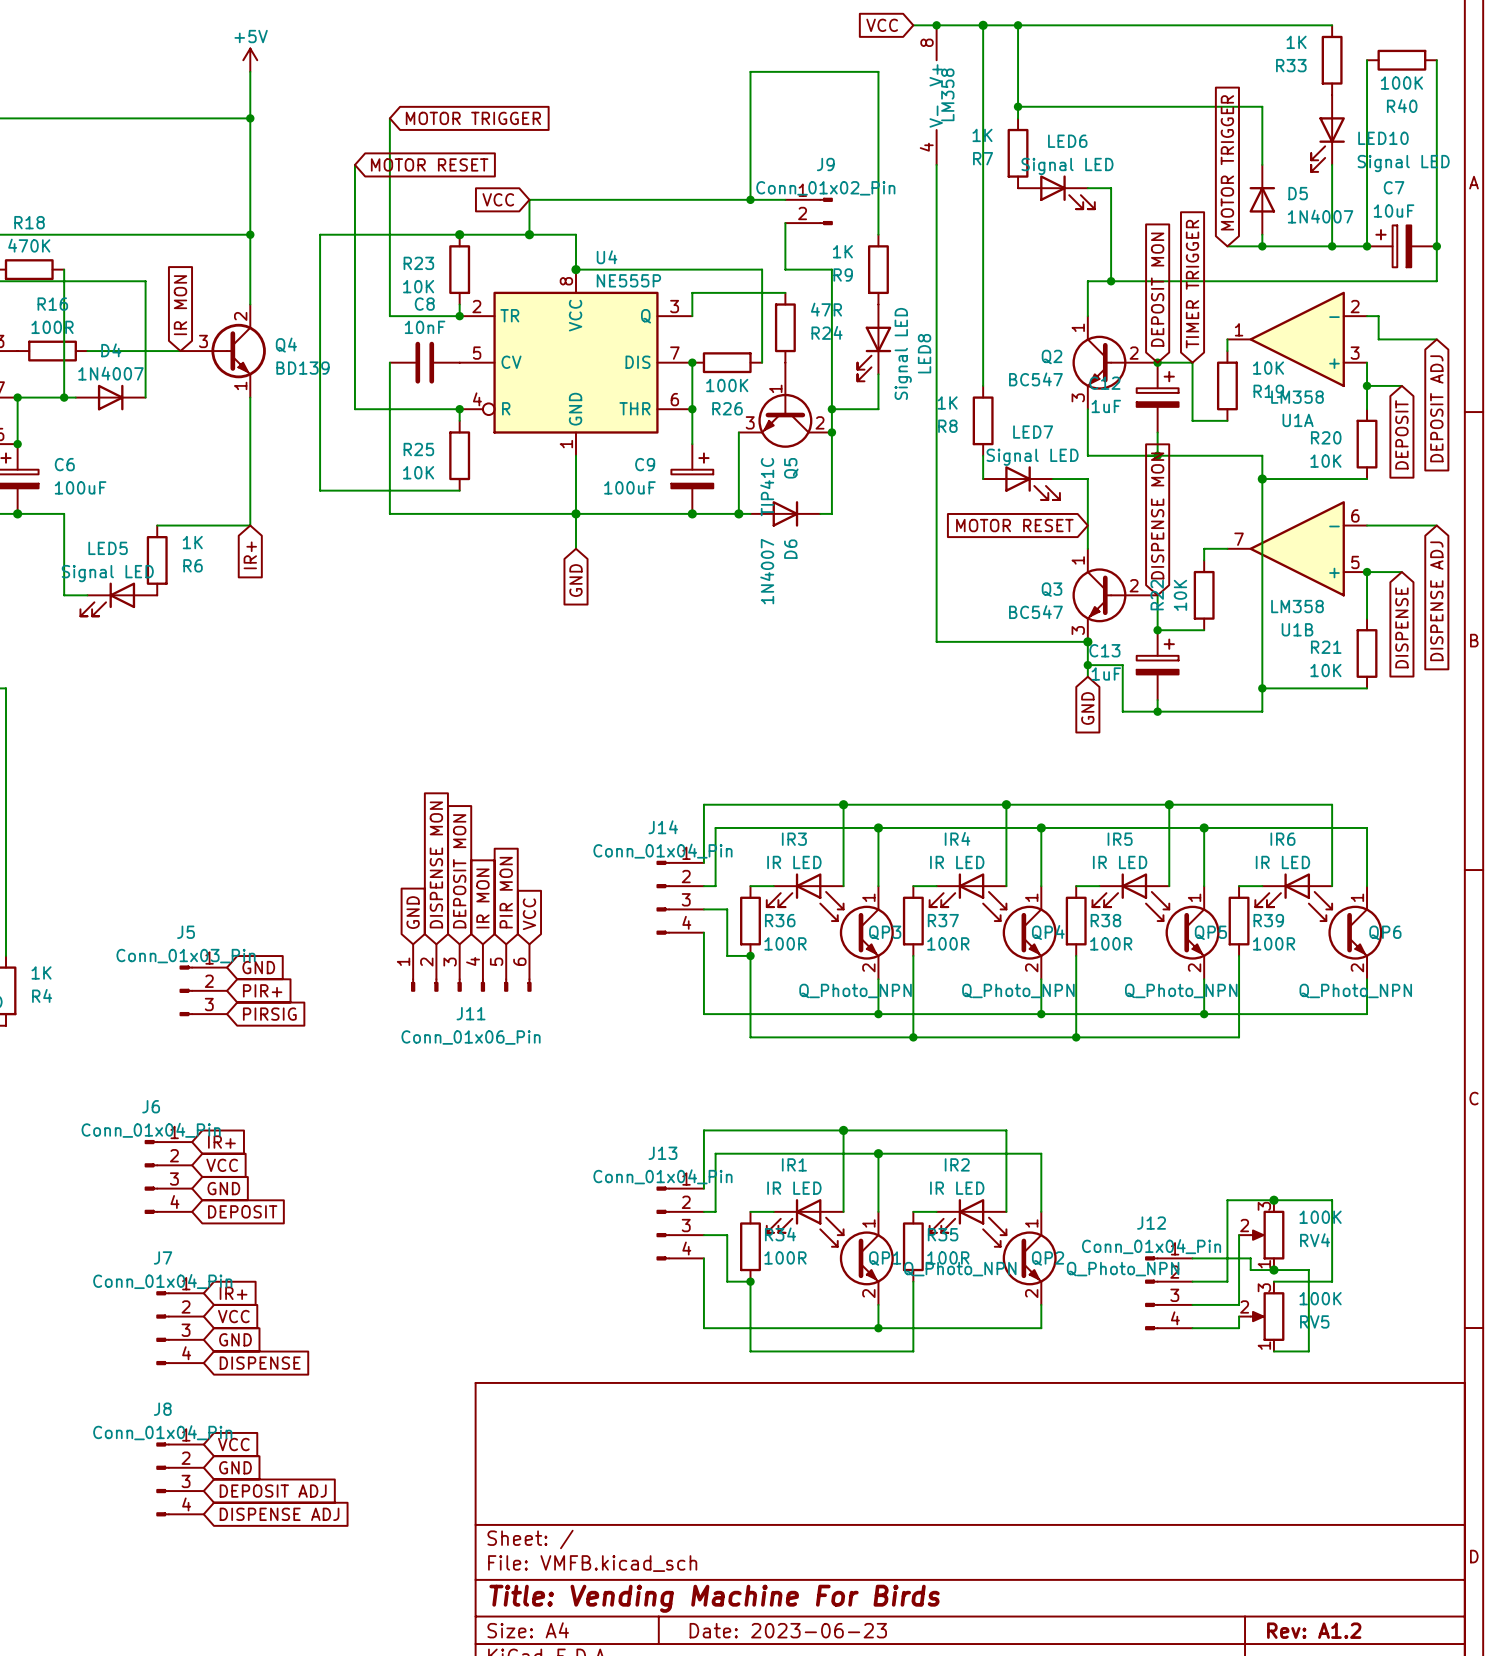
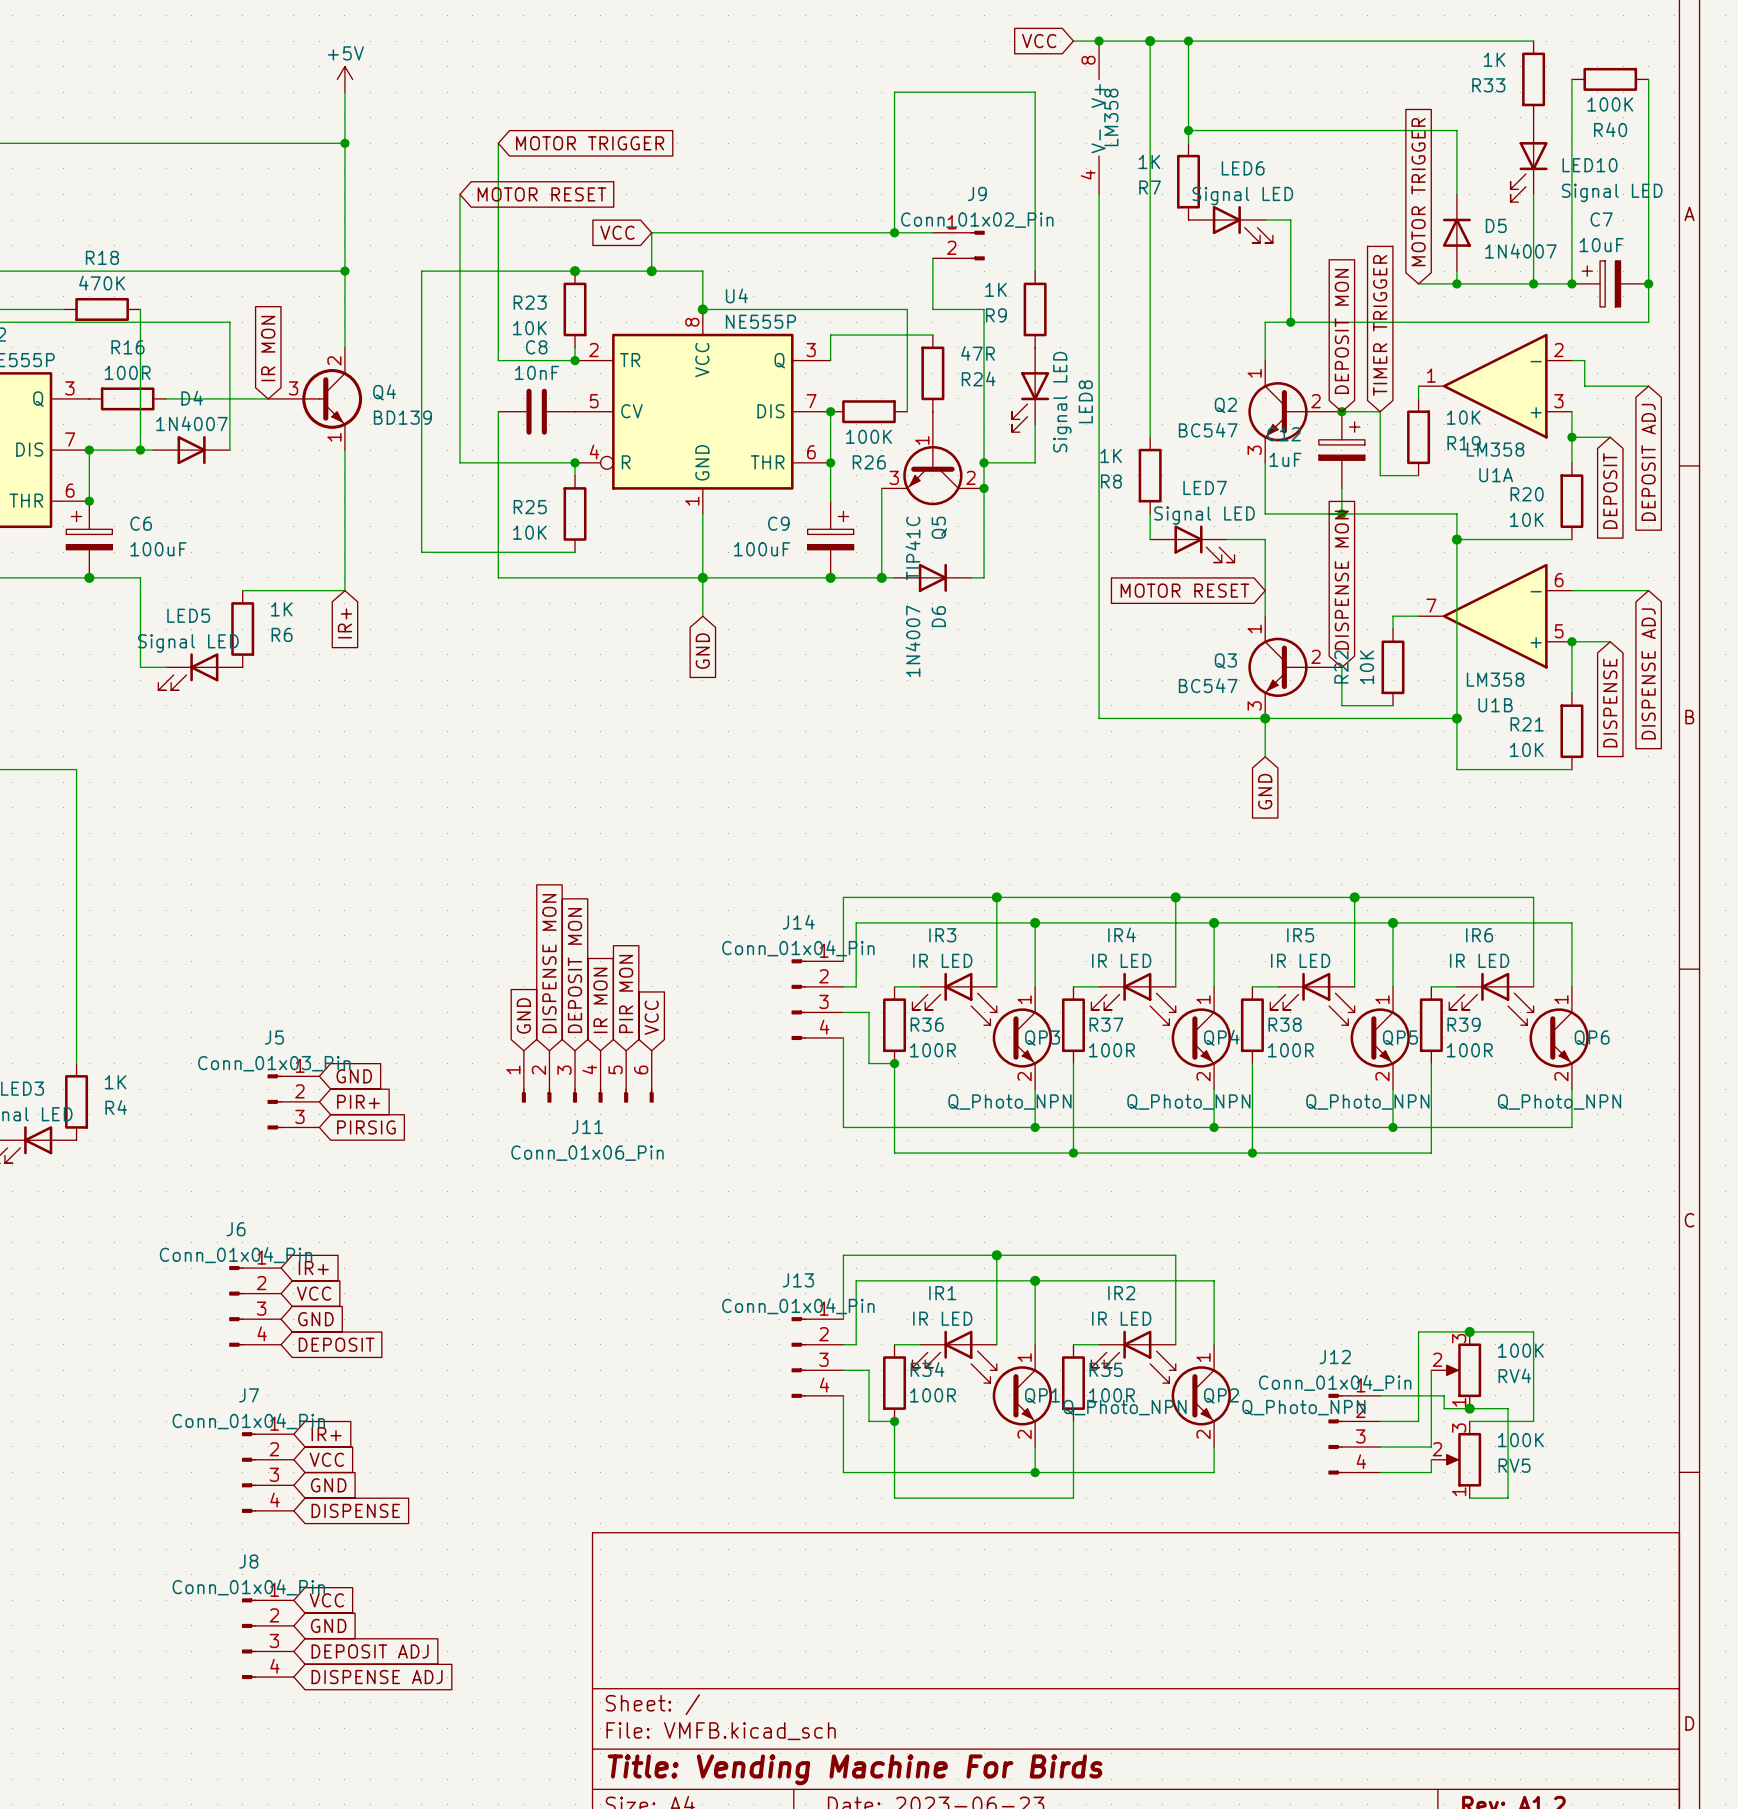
junction: (1157, 630) -> none
wire: none -> (1265, 718) (1456, 718)
junction: none -> (1456, 718)
wire: (1087, 665) (1122, 665) (1122, 711) (1262, 711) (1262, 688) -> none
junction: (1087, 665) -> none
C13: 1uF (1157, 665) -> none
junction: (1262, 688) -> none
wire: (1157, 700) (1157, 711) -> none
junction: (1157, 711) -> none

